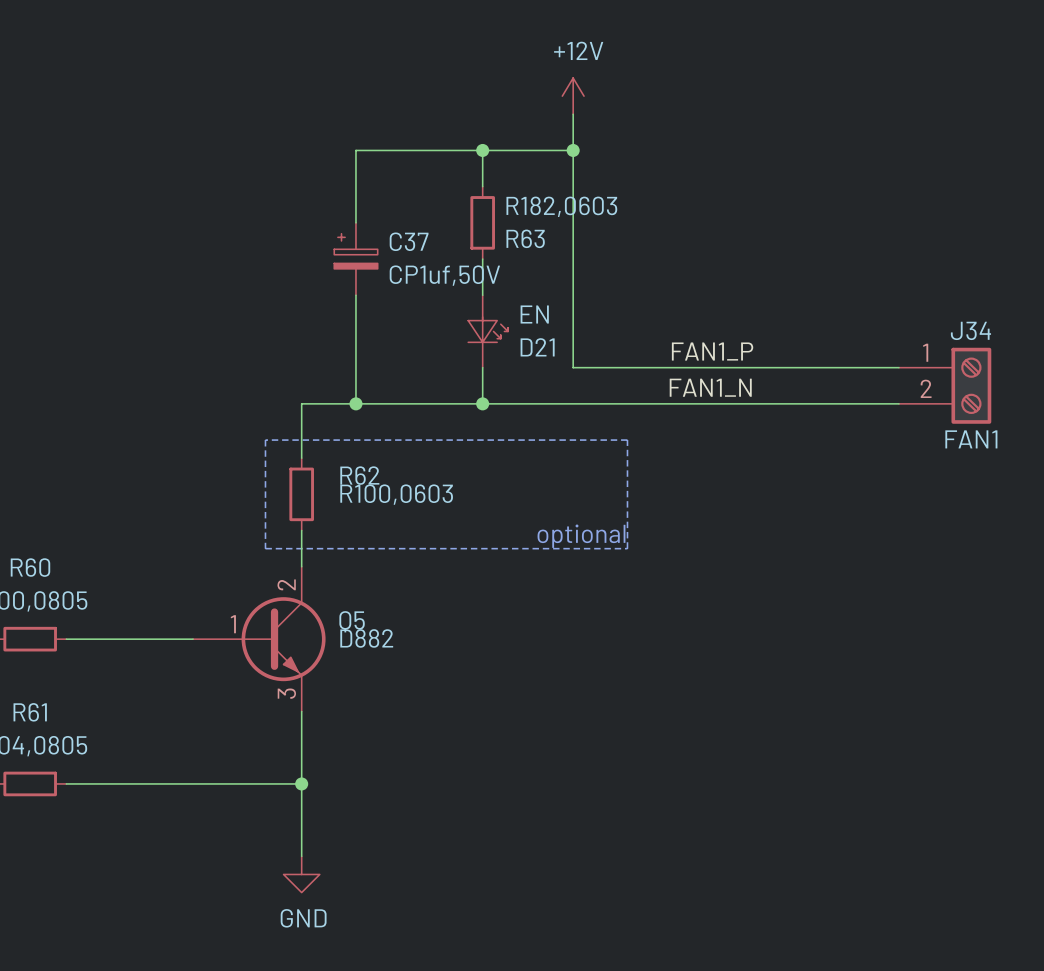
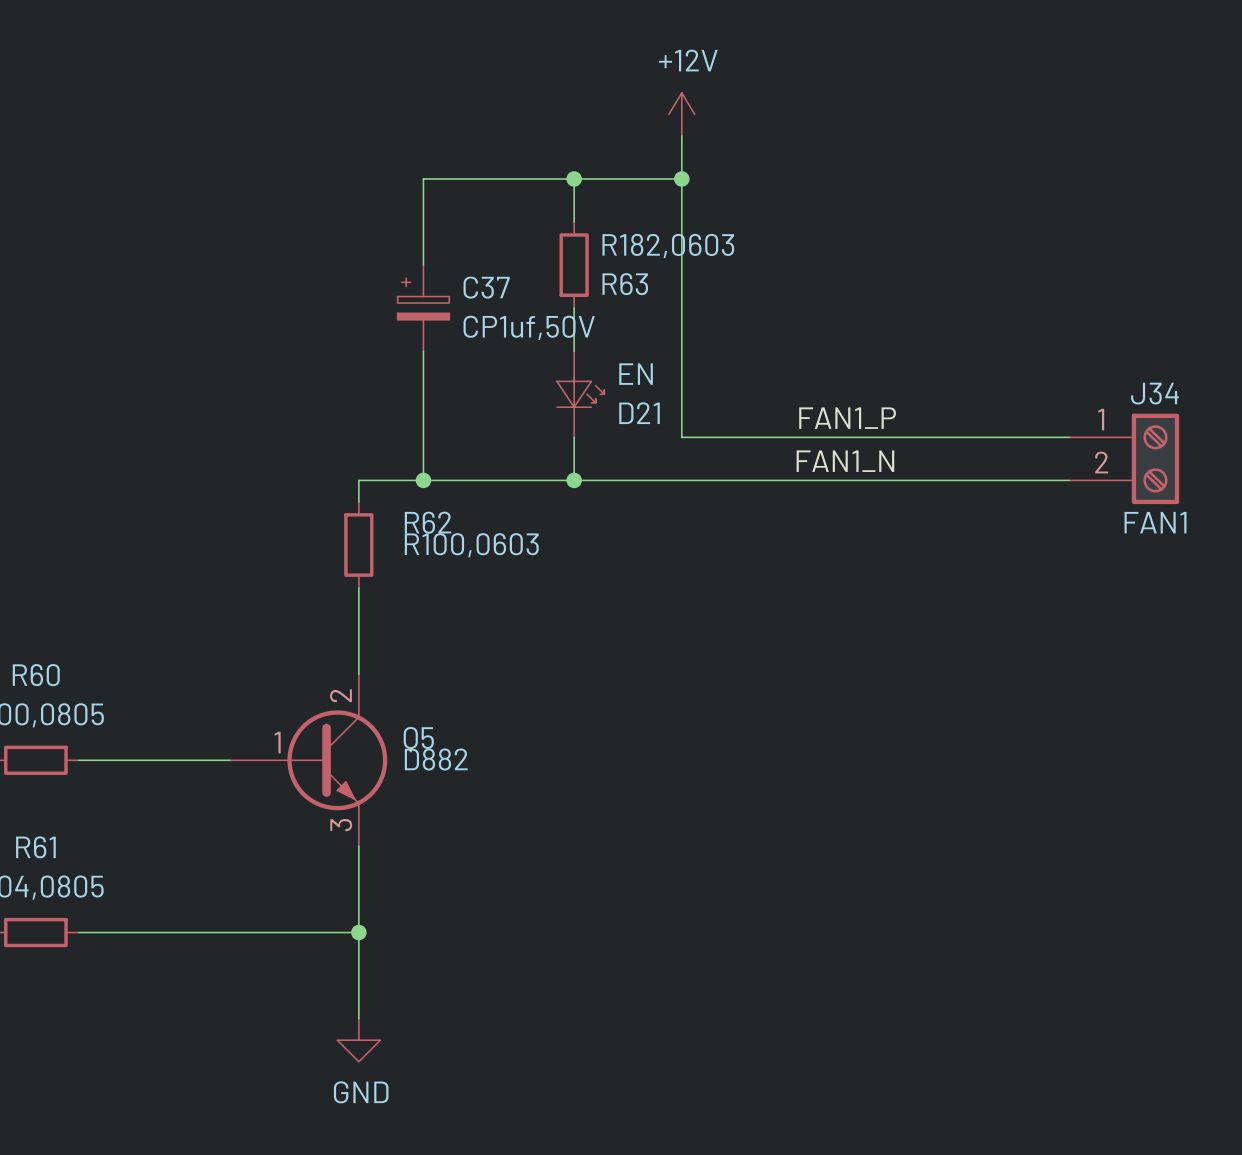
wire: (301, 421) (301, 458) -> (358, 588) (358, 631)
line: (265, 440) (627, 440) (627, 548) (265, 548) (265, 440) -> none
R62 position: (301, 494) -> (358, 545)
text: optional (581, 536) -> none

